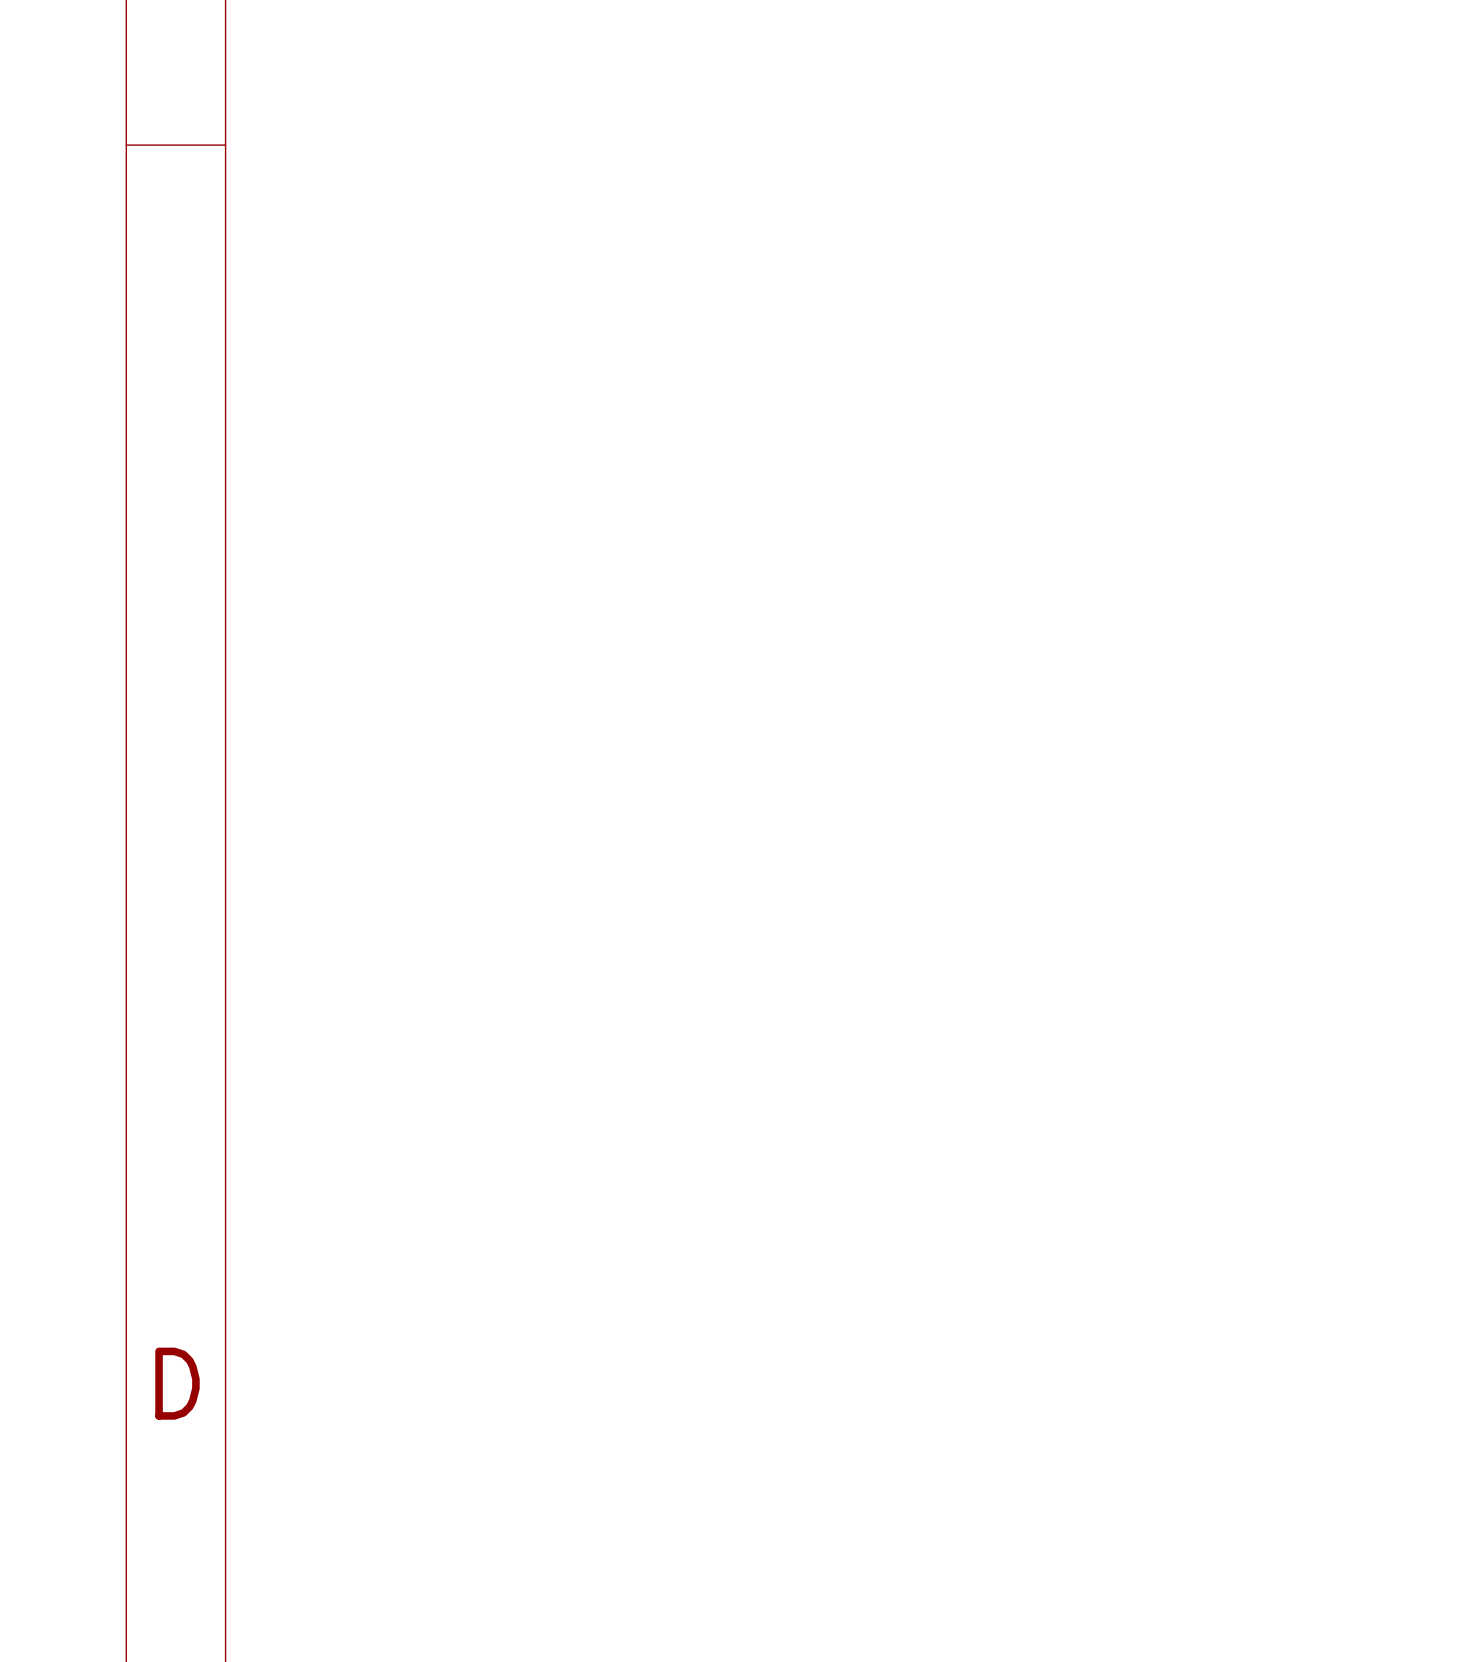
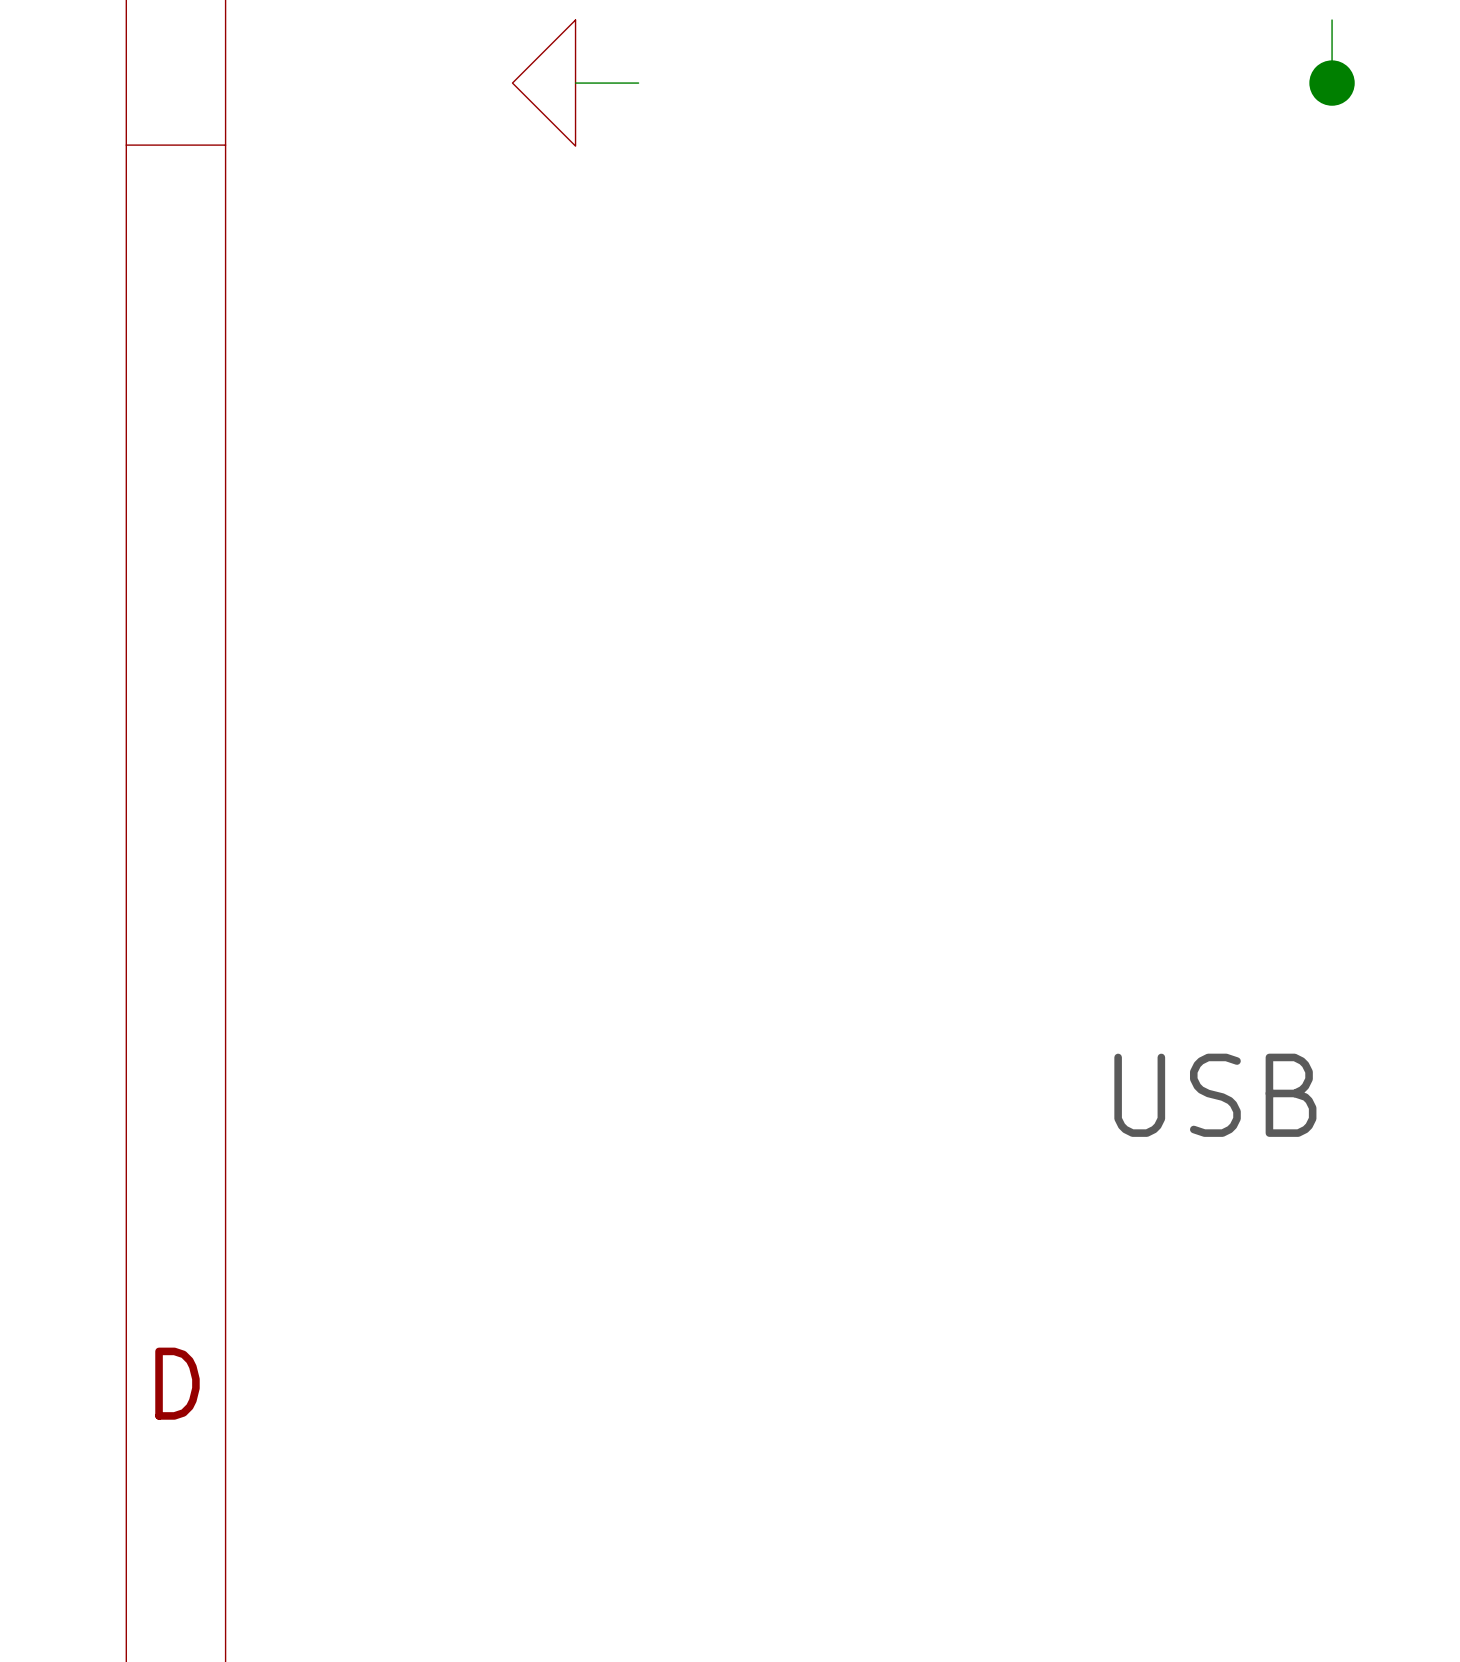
wire: none -> (1332, 20) (1332, 83)
power symbol: none -> (544, 83)
wire: none -> (575, 83) (638, 83)
junction: none -> (1332, 83)
text: none -> USB (1215, 1095)

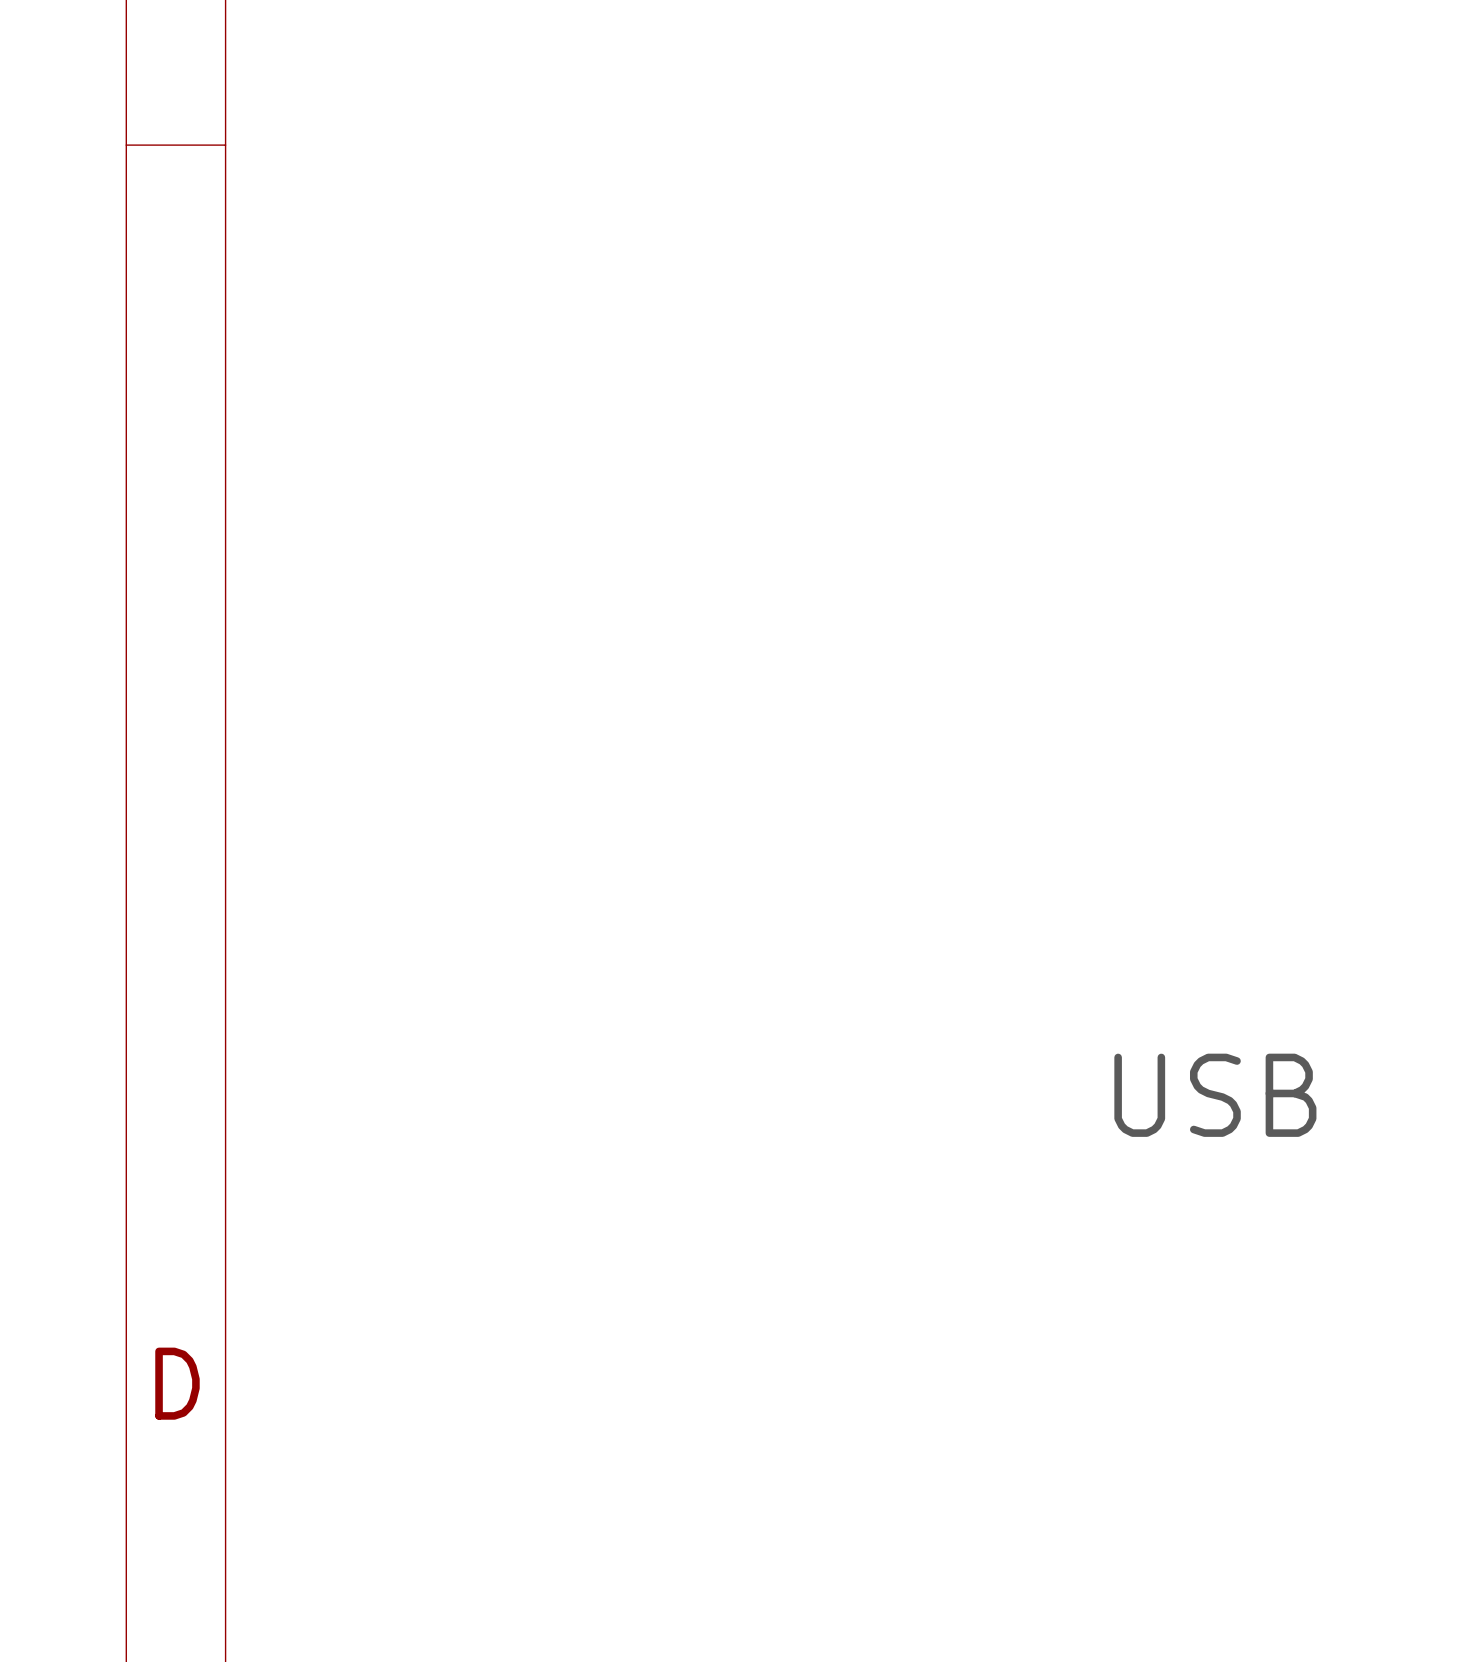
wire: (1332, 20) (1332, 83) -> none
power symbol: (544, 83) -> none
wire: (575, 83) (638, 83) -> none
junction: (1332, 83) -> none

